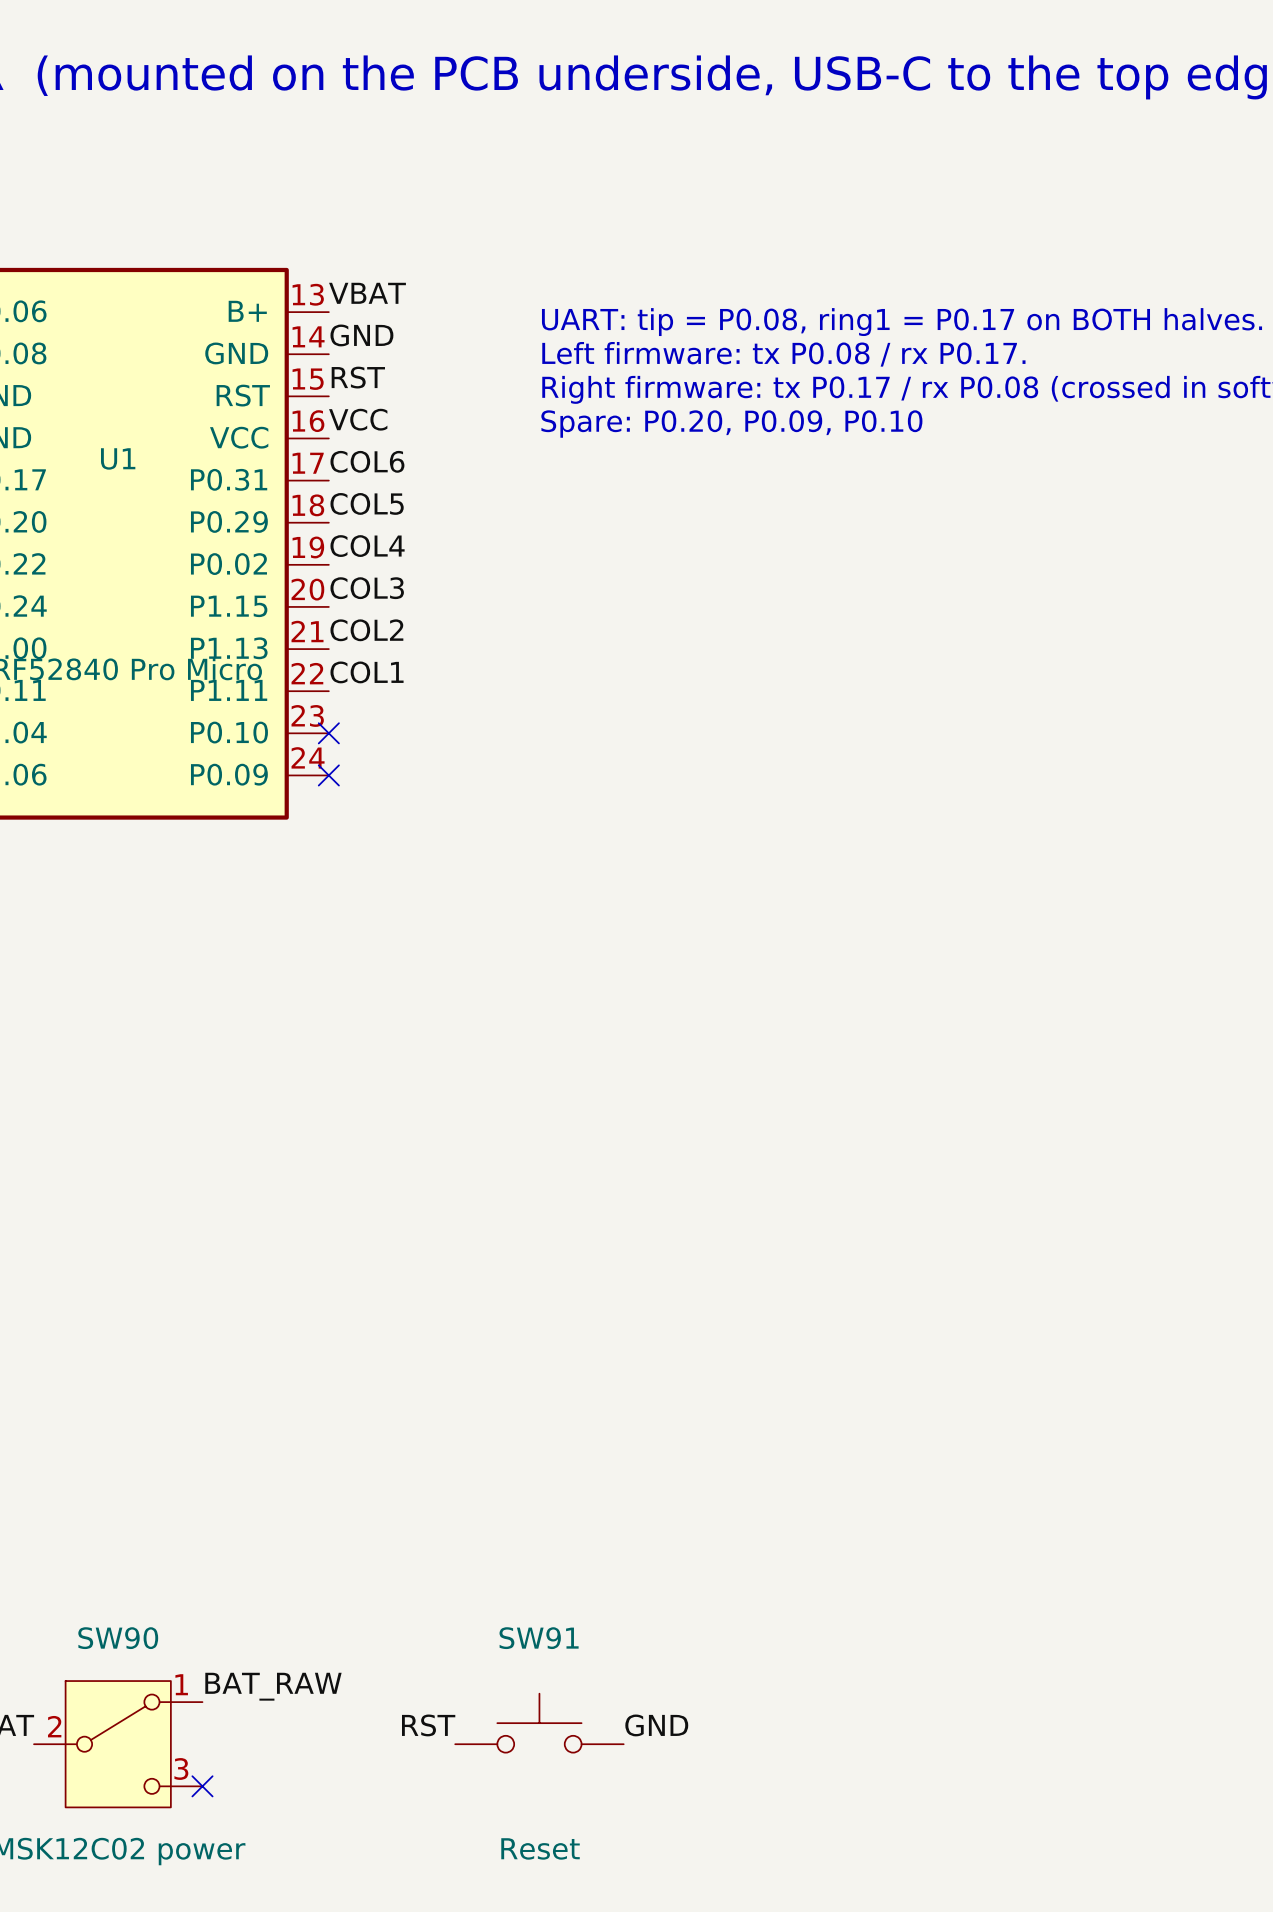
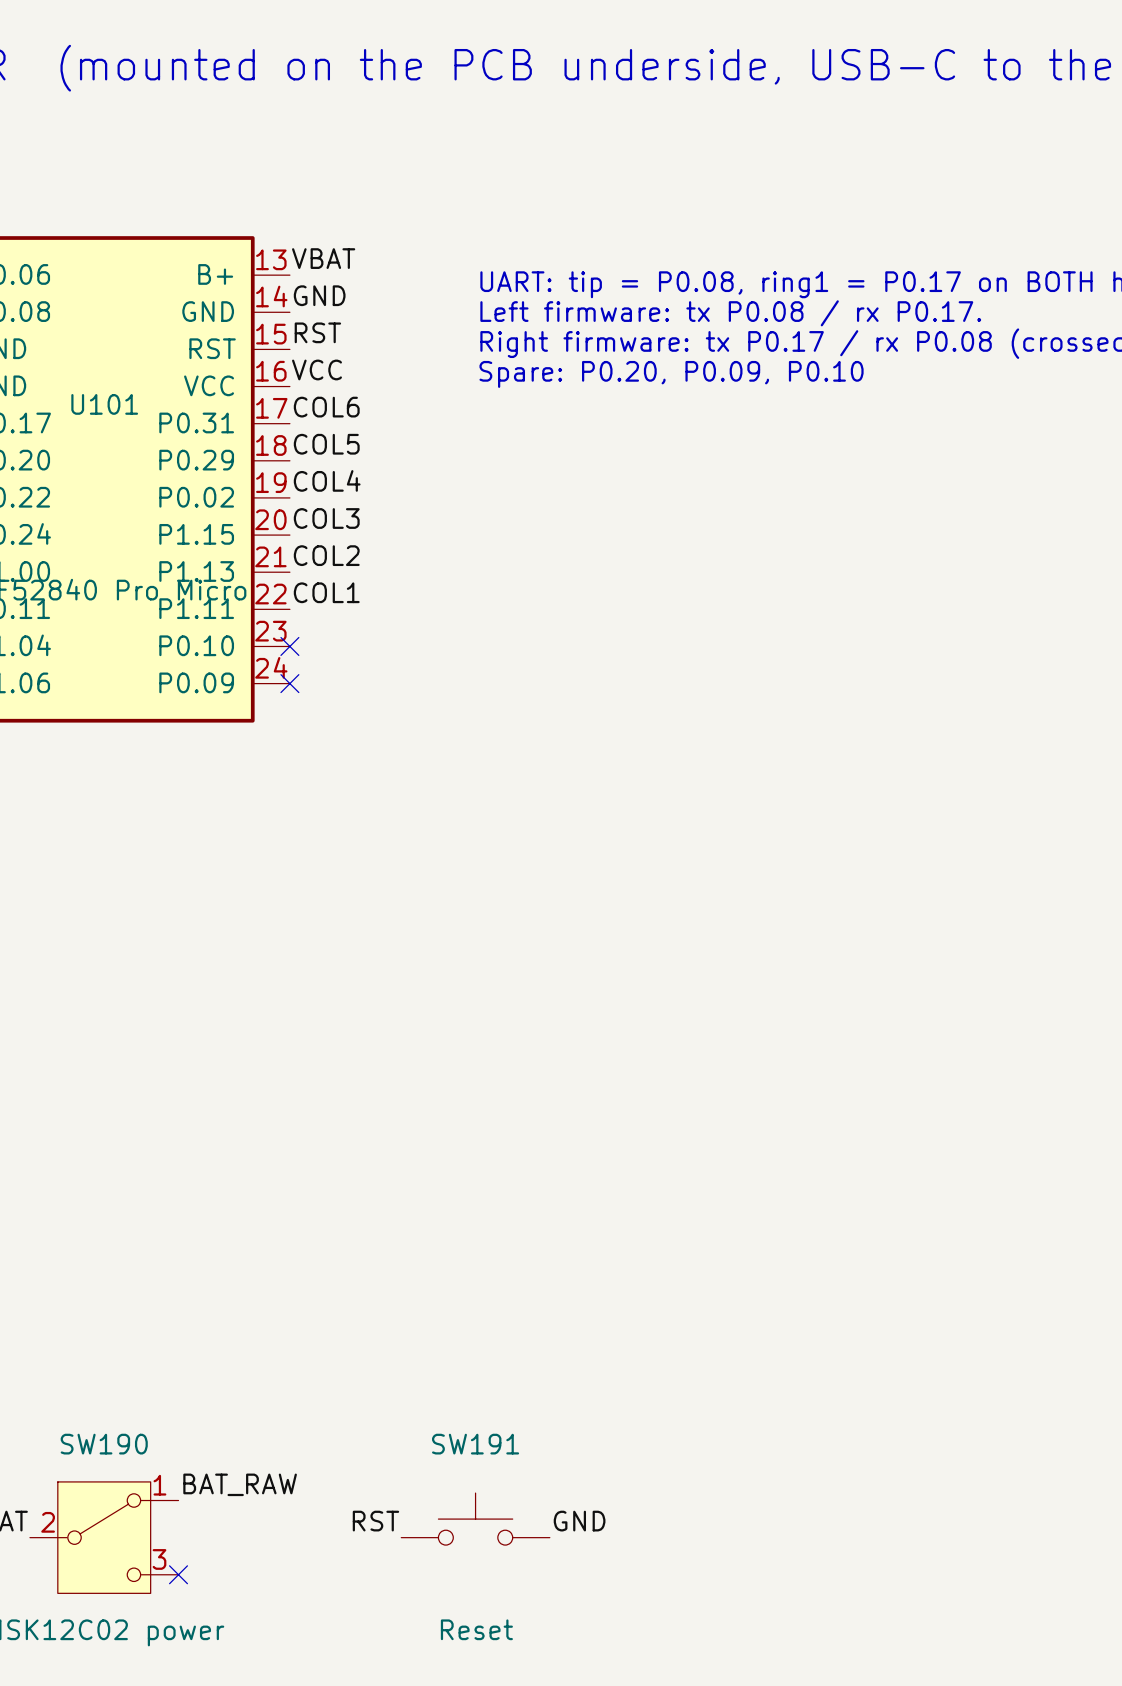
U1 name: U1 (118, 458) -> U101 (104, 404)
SW90 name: SW90 (118, 1638) -> SW190 (104, 1444)
SW91 name: SW91 (539, 1638) -> SW191 (475, 1444)

